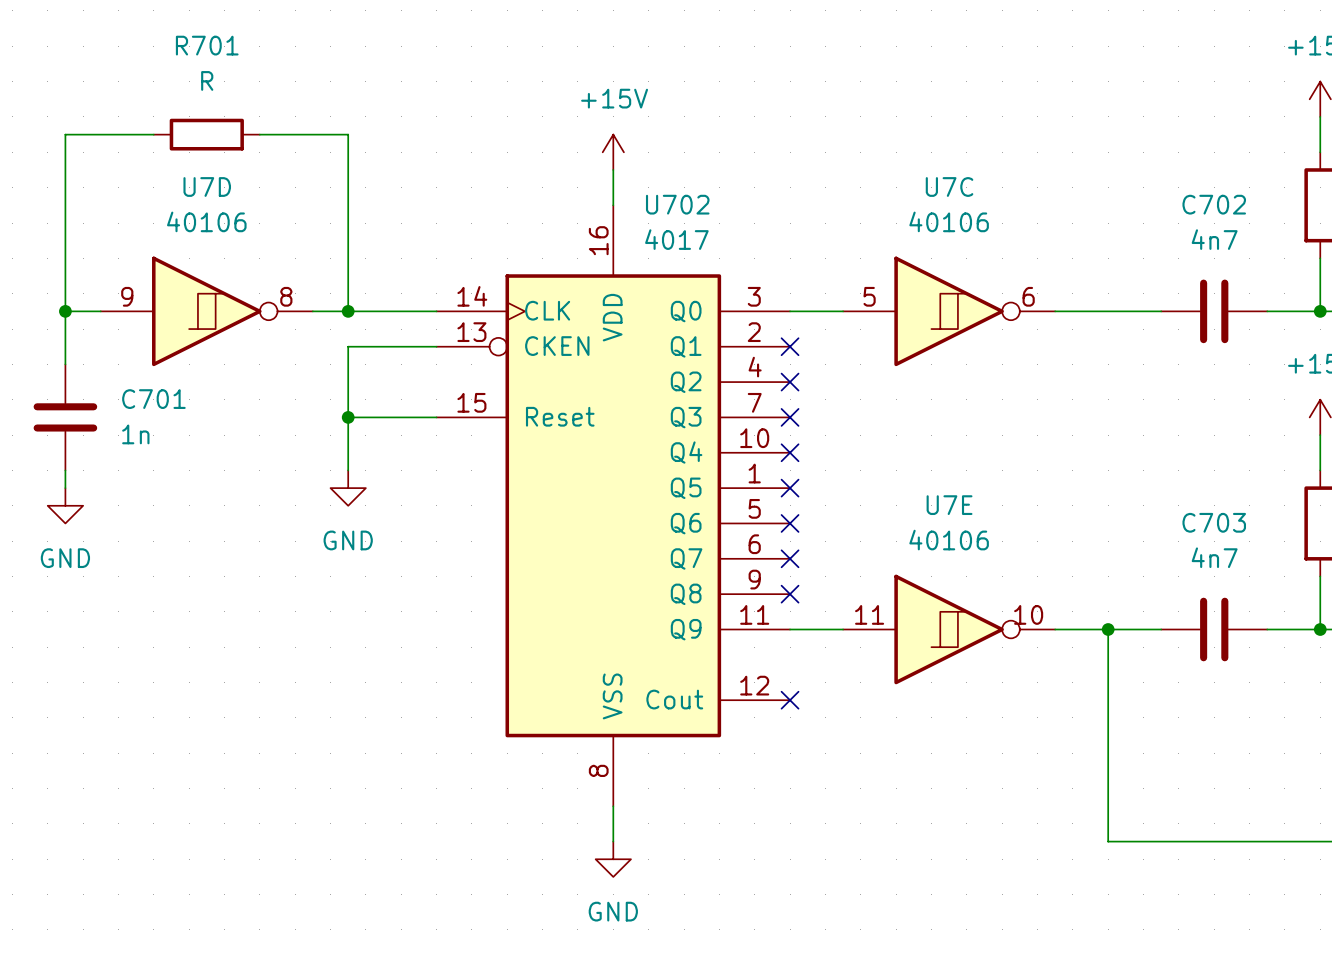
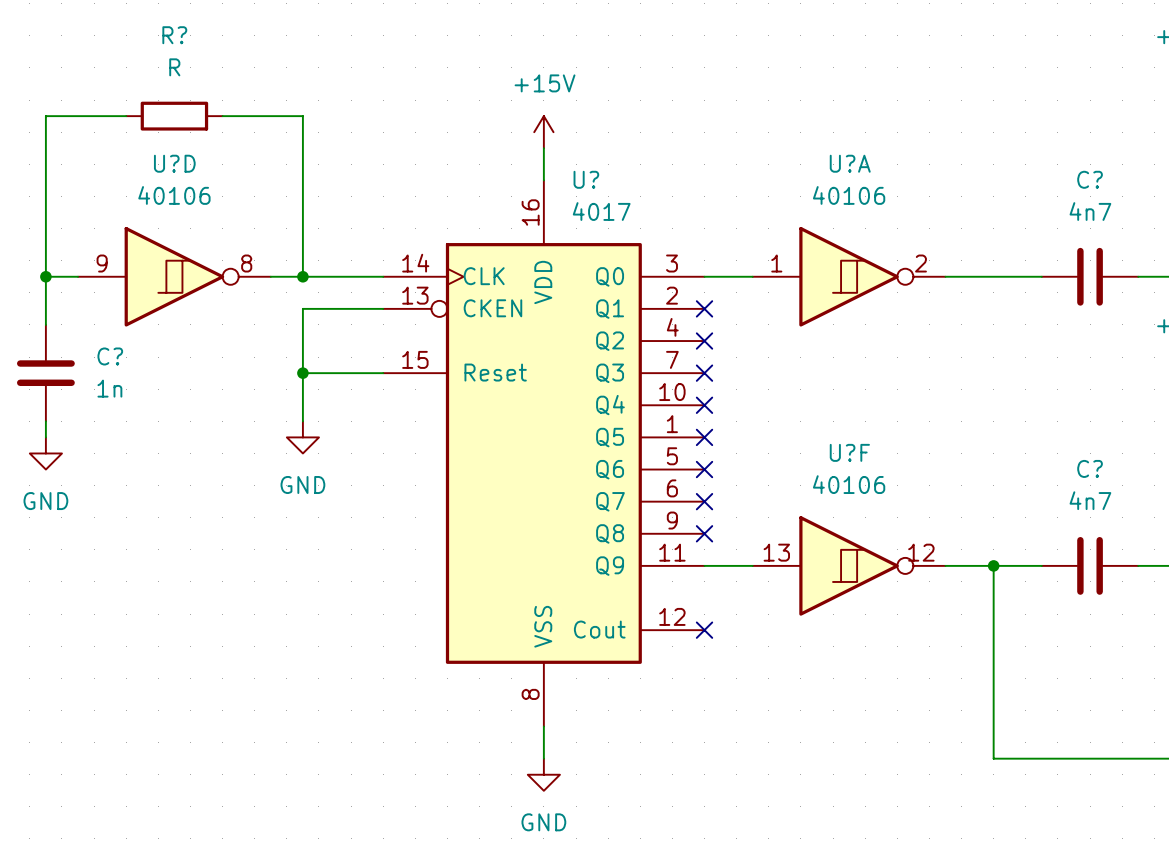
R701 name: R701 (207, 45) -> R? (174, 35)
U7D name: U7D (207, 186) -> U?D (174, 163)
U7C name: U7C (949, 186) -> U?A (850, 163)
U702 name: U702 (677, 204) -> U? (586, 179)
C702 name: C702 (1214, 204) -> C? (1090, 179)
U7C pin number: 5 (869, 296) -> 1 (776, 263)
U7C pin number: 6 (1028, 296) -> 2 (920, 263)
C701 name: C701 (153, 399) -> C? (110, 356)
U7E name: U7E (949, 505) -> U?F (849, 452)
C703 name: C703 (1214, 522) -> C? (1090, 468)
U7E pin number: 11 (869, 614) -> 13 (776, 552)
U7E pin number: 10 (1028, 614) -> 12 (921, 552)

